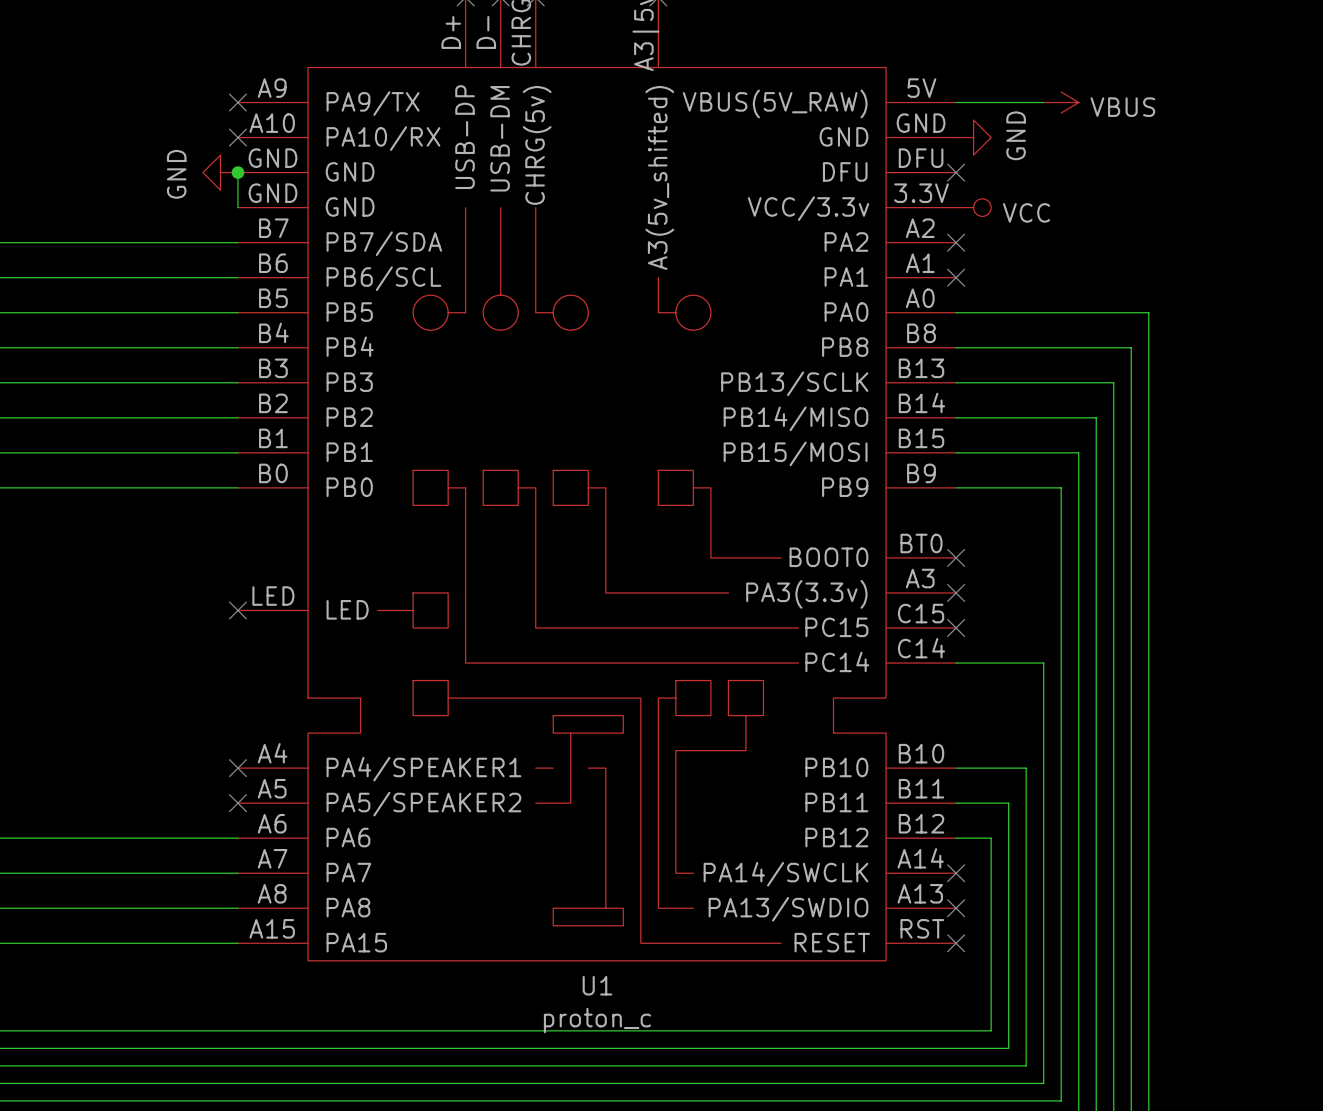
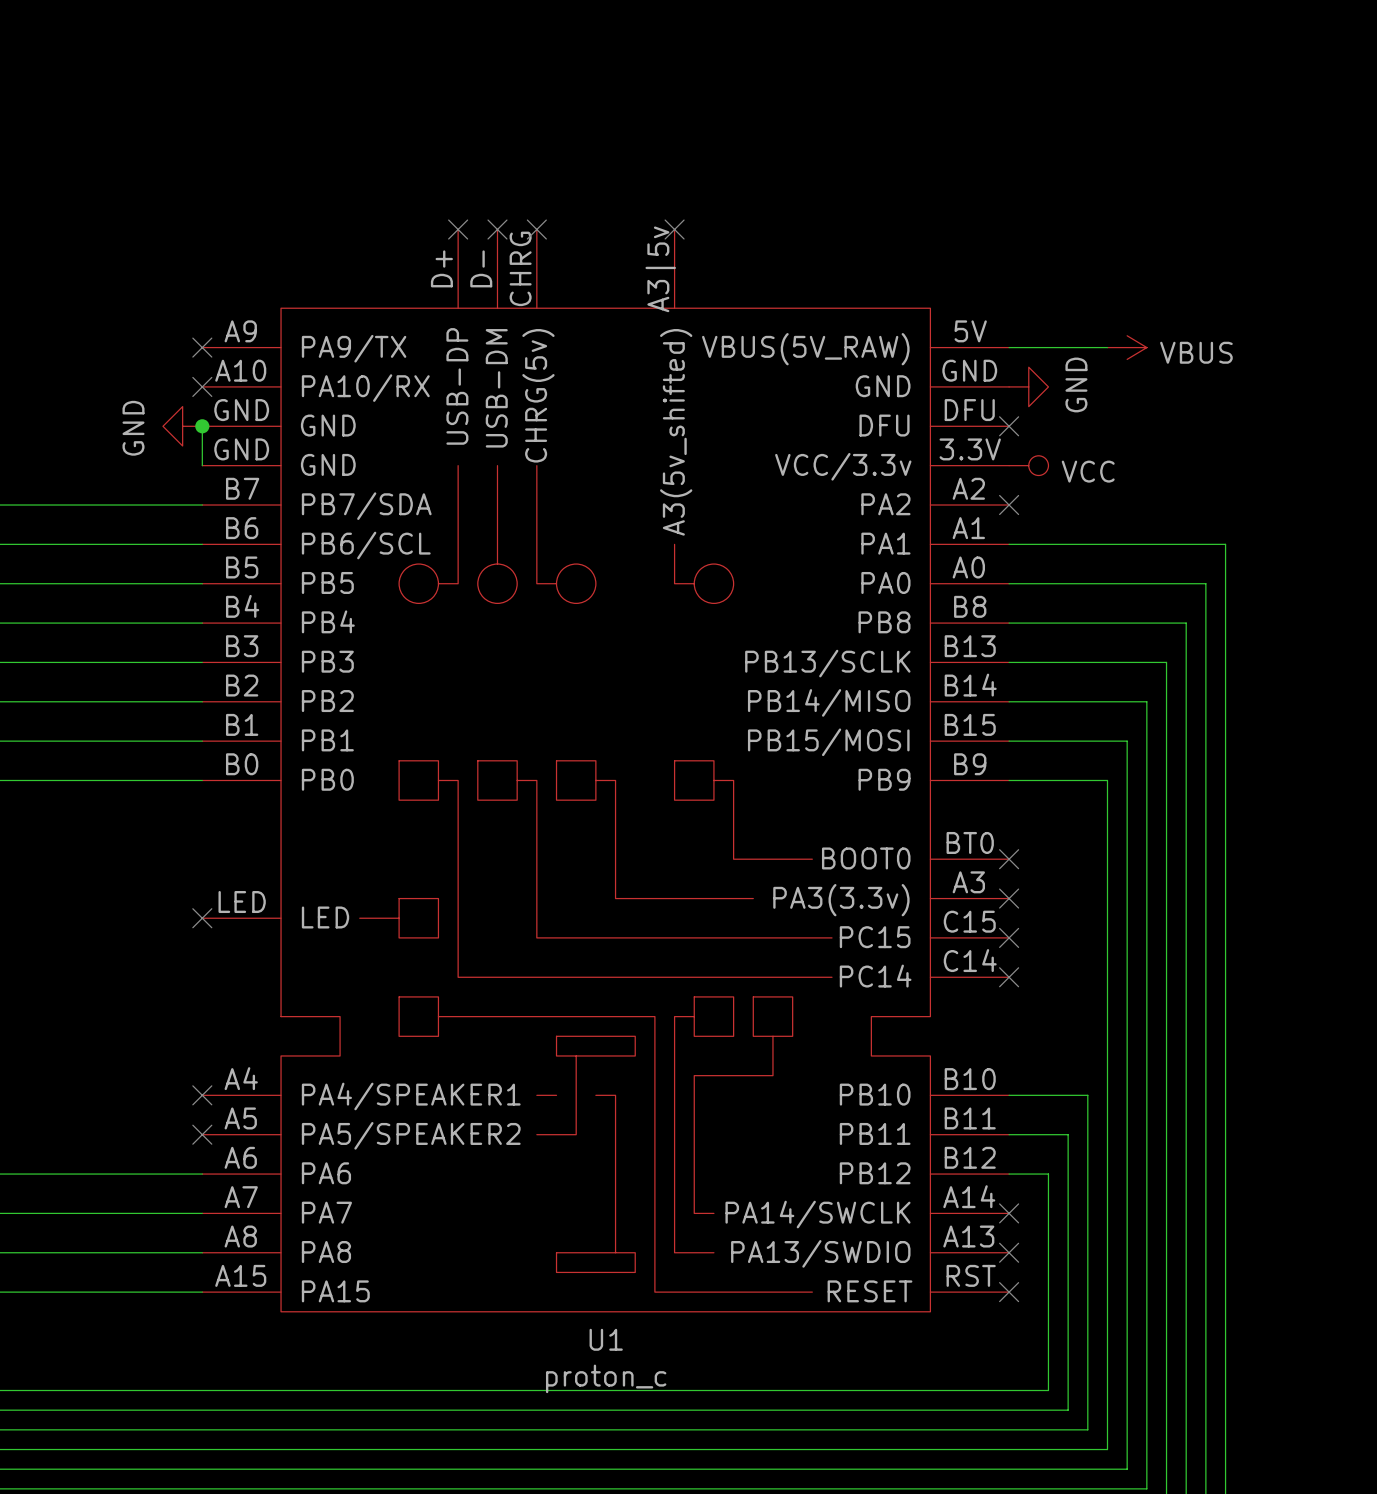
wire: none -> (1009, 544) (1225, 544) (1225, 583)
no-connect mark: (956, 277) -> none
wire: (1131, 312) (1148, 312) -> (1205, 583) (1205, 623)
wire: (1113, 347) (1131, 347) -> none
wire: (1096, 382) (1113, 382) -> (1186, 623) (1186, 662)
wire: (1078, 417) (1096, 417) -> (1166, 662) (1166, 701)
wire: (1061, 452) (1078, 452) -> (1146, 701) (1146, 741)
wire: (1043, 487) (1061, 487) -> (1127, 741) (1127, 780)
wire: (956, 663) (1043, 663) -> (1107, 780) (1107, 977)
no-connect mark: none -> (1009, 977)

